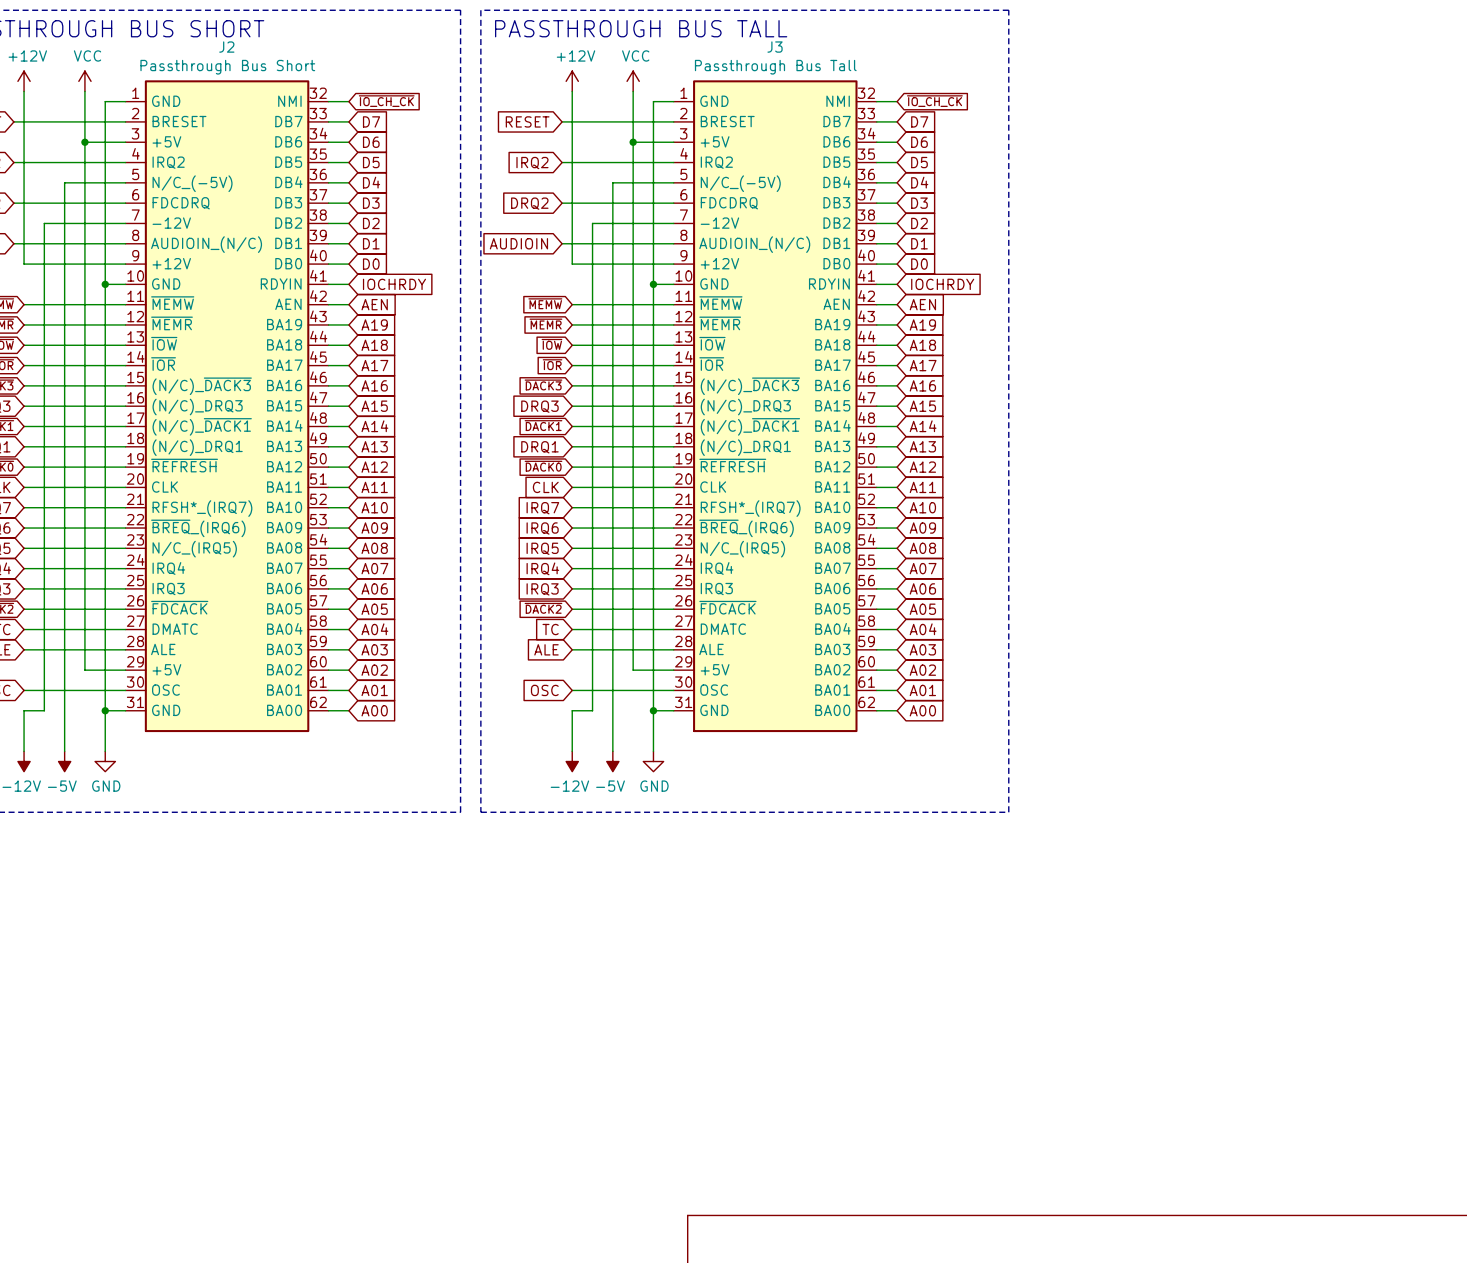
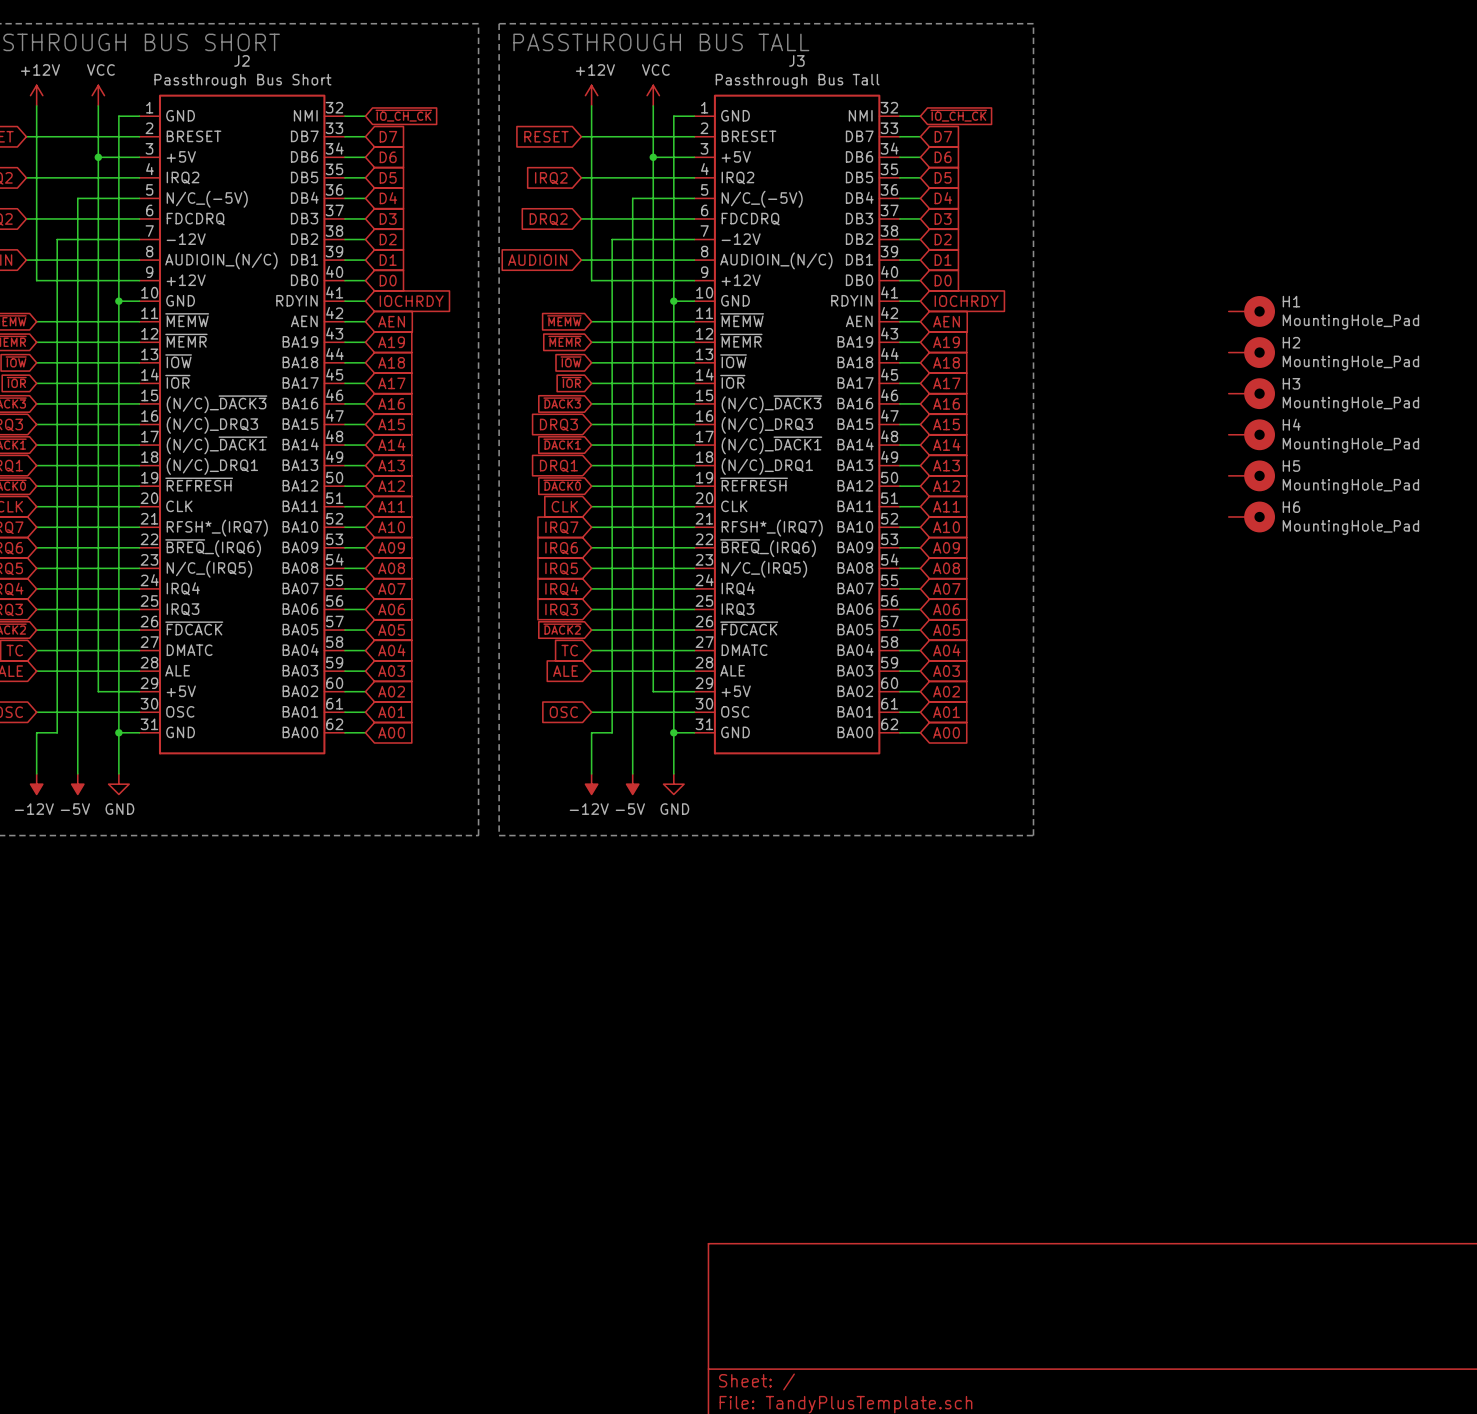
H1: none -> MountingHole_Pad (1251, 311)
H2: none -> MountingHole_Pad (1251, 352)
H3: none -> MountingHole_Pad (1251, 393)
H4: none -> MountingHole_Pad (1251, 434)
H5: none -> MountingHole_Pad (1251, 475)
H6: none -> MountingHole_Pad (1251, 516)

